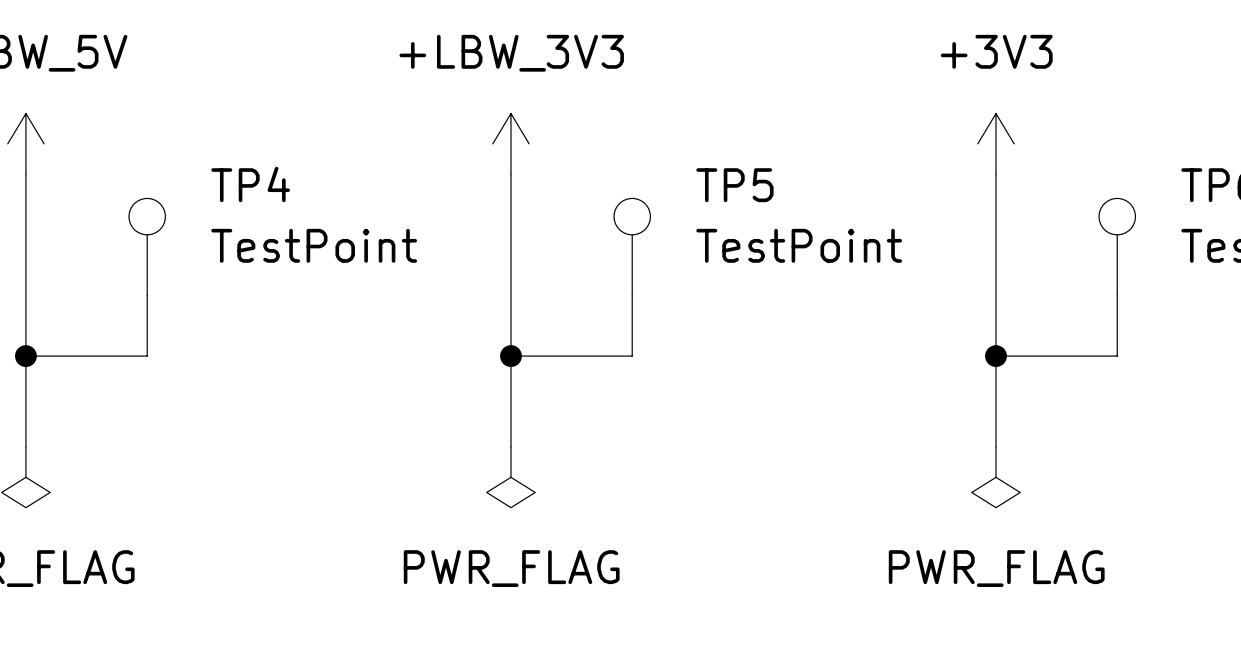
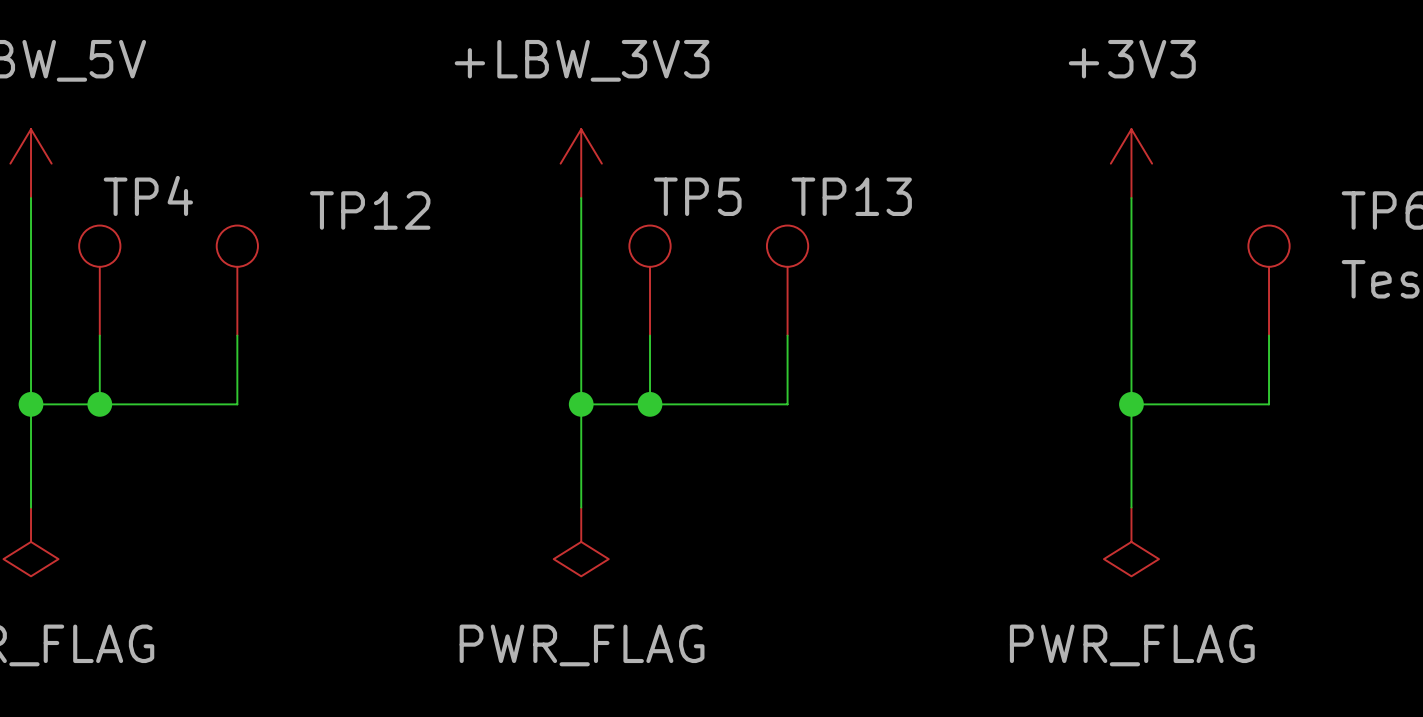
TP4 name position: TP4 (250, 184) -> TP4 (148, 195)
TP5 name position: TP5 (734, 185) -> TP5 (697, 196)
TP4 value: TestPoint (314, 245) -> none
TP5 value: TestPoint (799, 245) -> none
TP4 position: (147, 246) -> (99, 280)
TP12: none -> (237, 280)
TP5 position: (632, 246) -> (650, 280)
TP13: none -> (787, 280)
wire: none -> (99, 335) (99, 404)
wire: (147, 295) (147, 356) -> (237, 335) (237, 404) (168, 404)
wire: none -> (650, 335) (650, 404)
wire: (632, 295) (632, 356) -> (787, 335) (787, 404) (718, 404)
junction: none -> (99, 404)
junction: none -> (650, 404)

